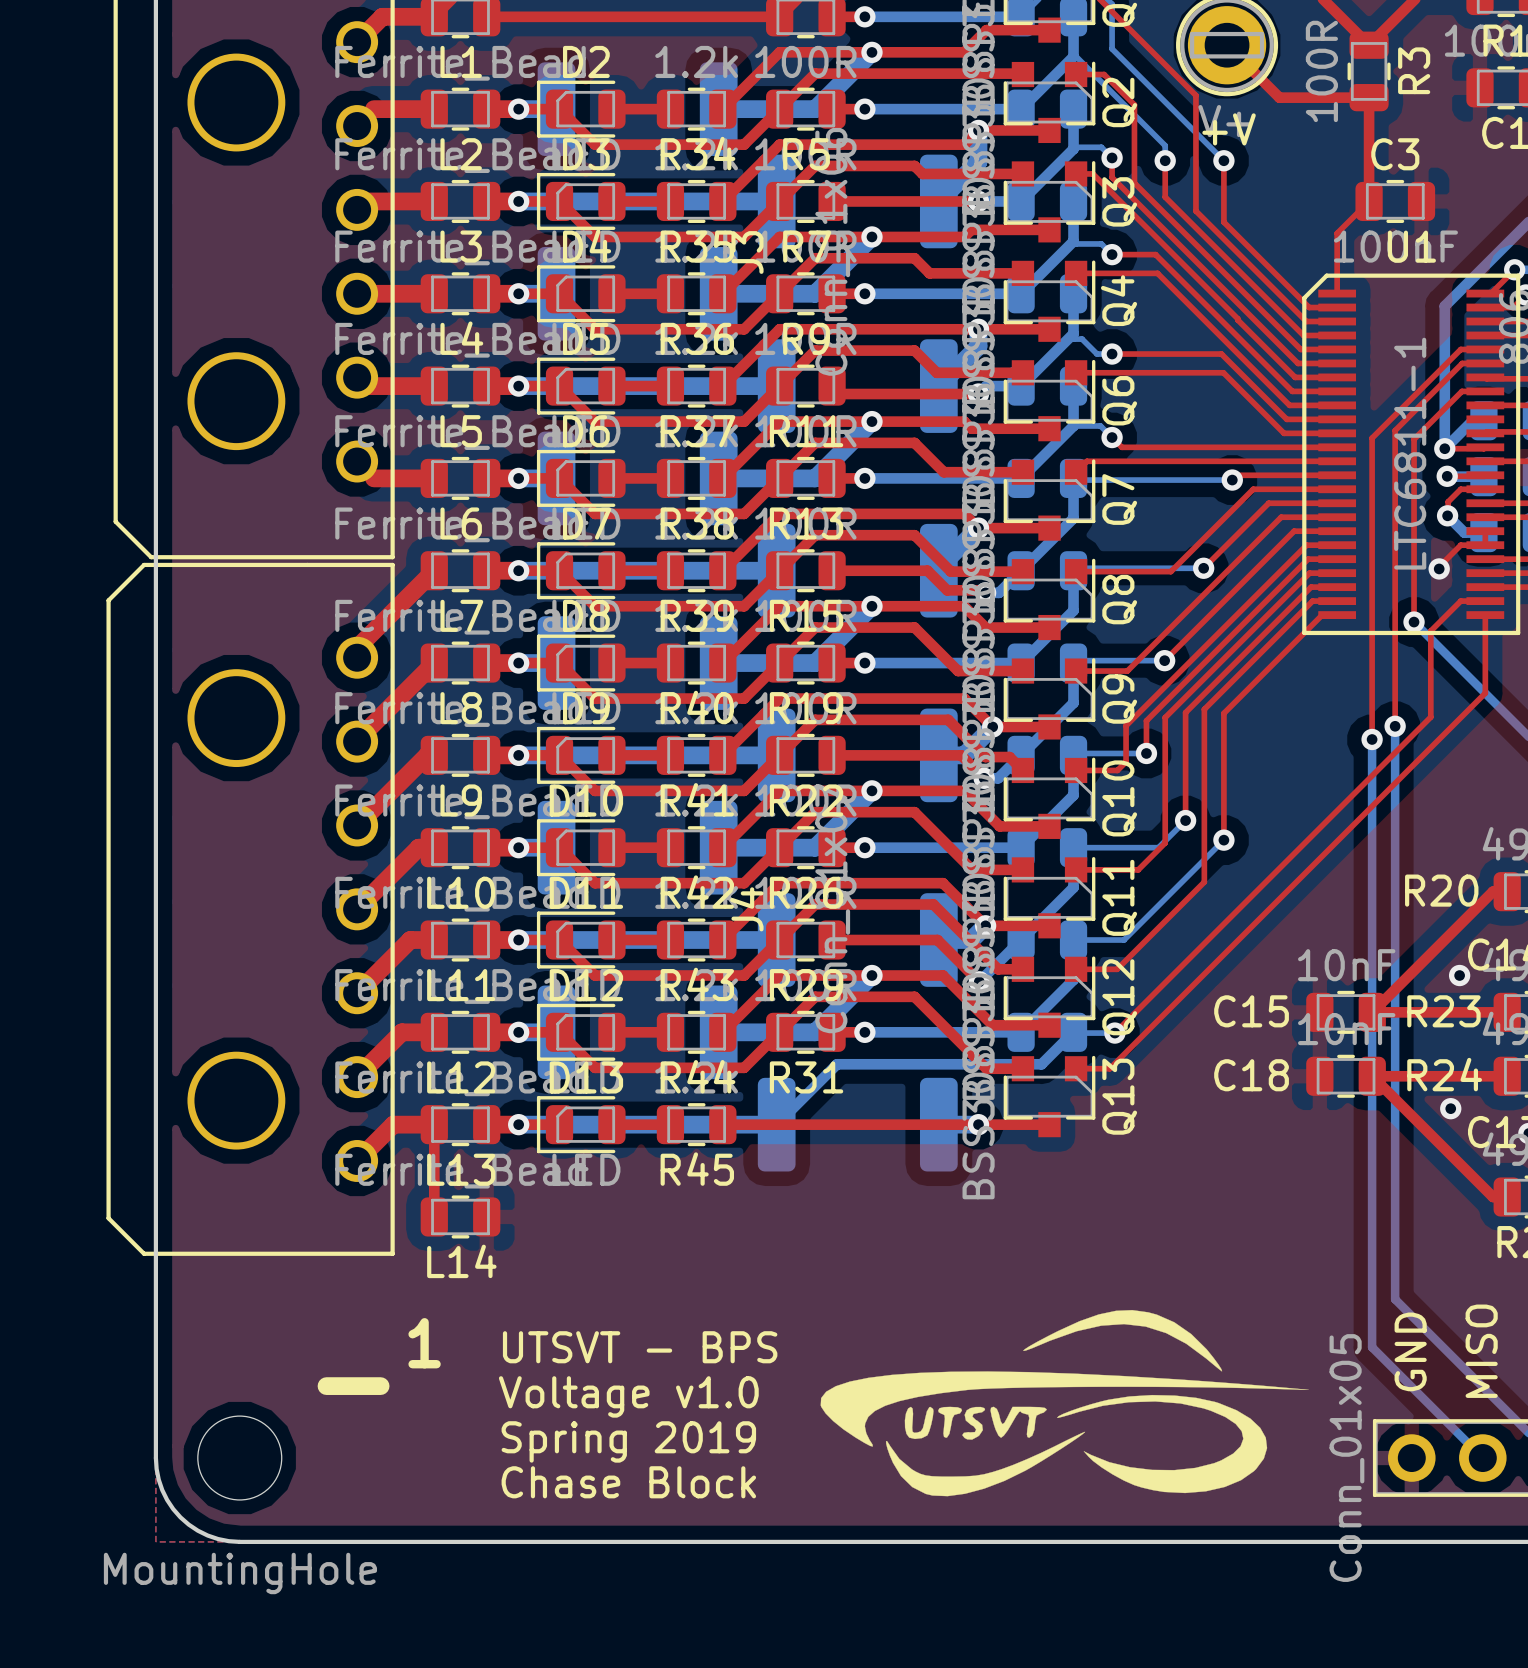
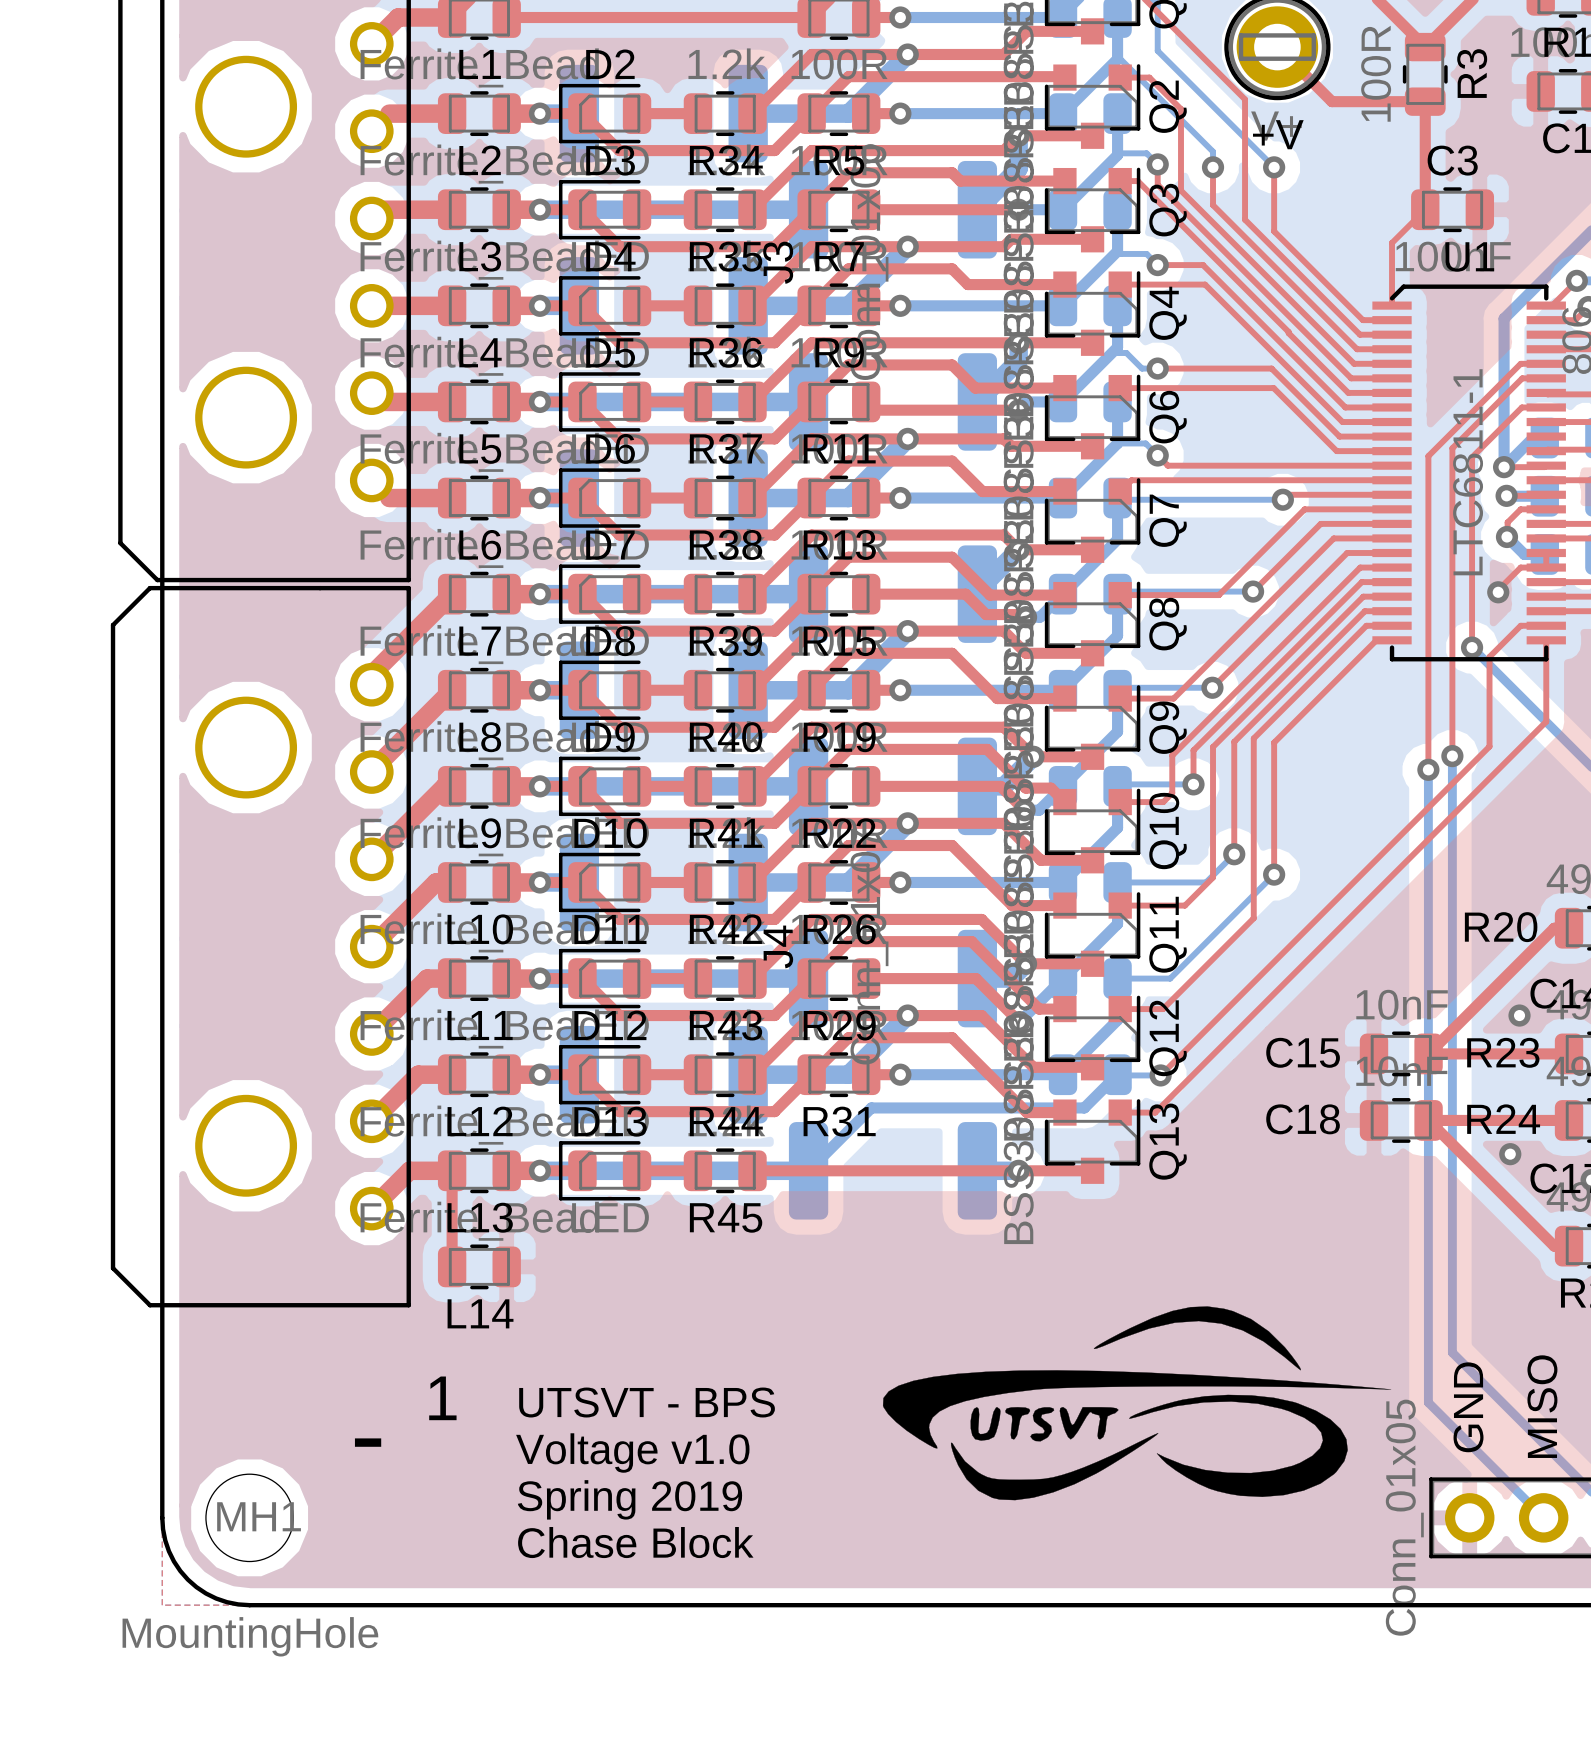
U1 footprint: [1302, 273, 1521, 636] -> [1372, 284, 1566, 662]
drawing position: (1064, 1403) -> (1137, 1403)
MH1 name: none -> MH1 (259, 1516)

